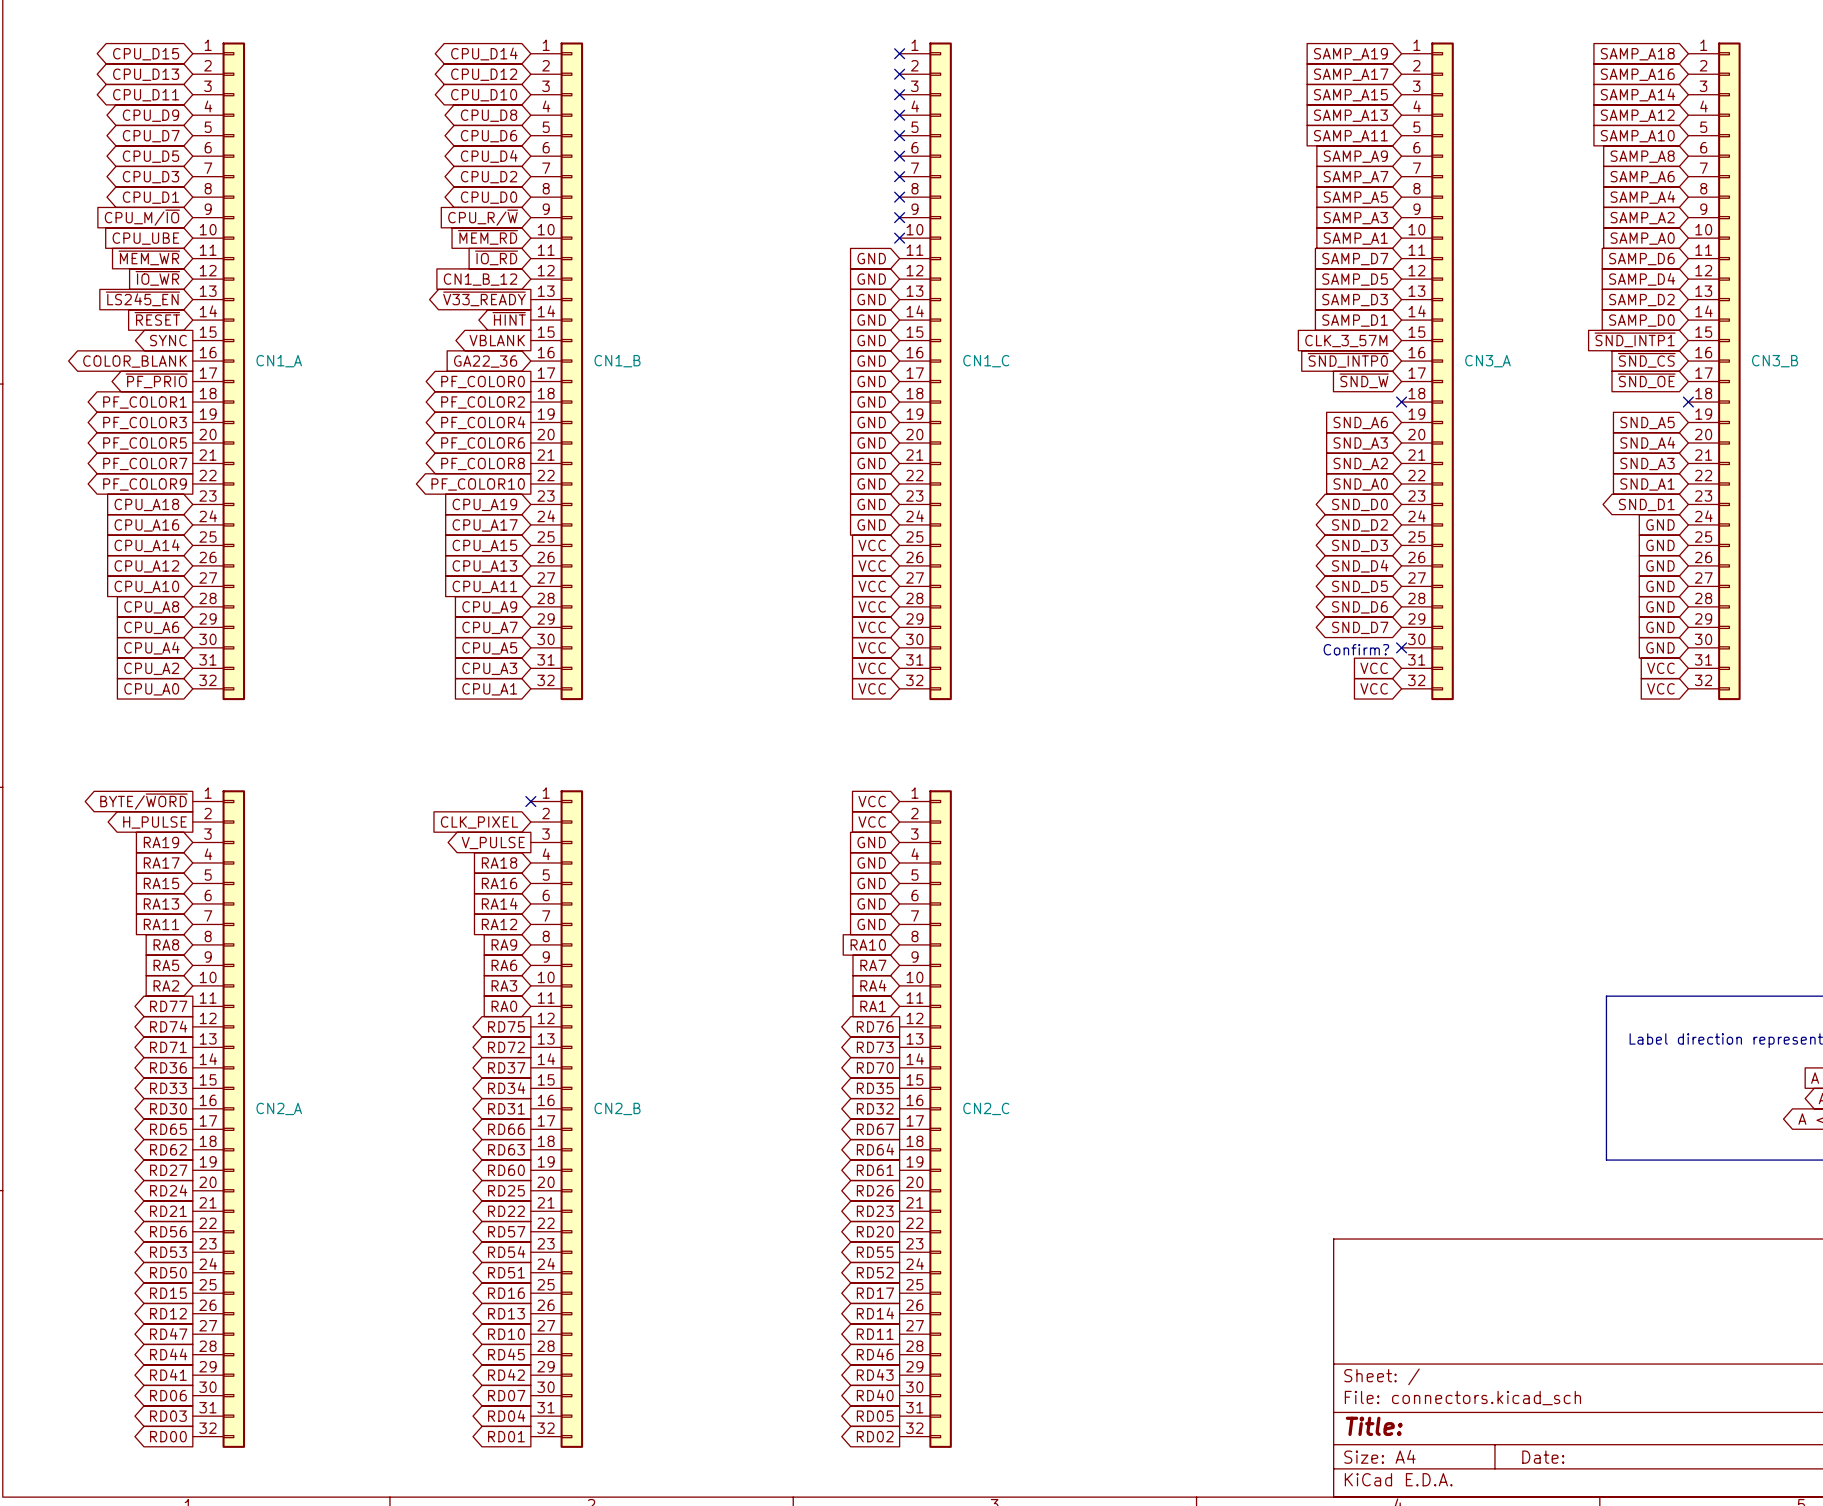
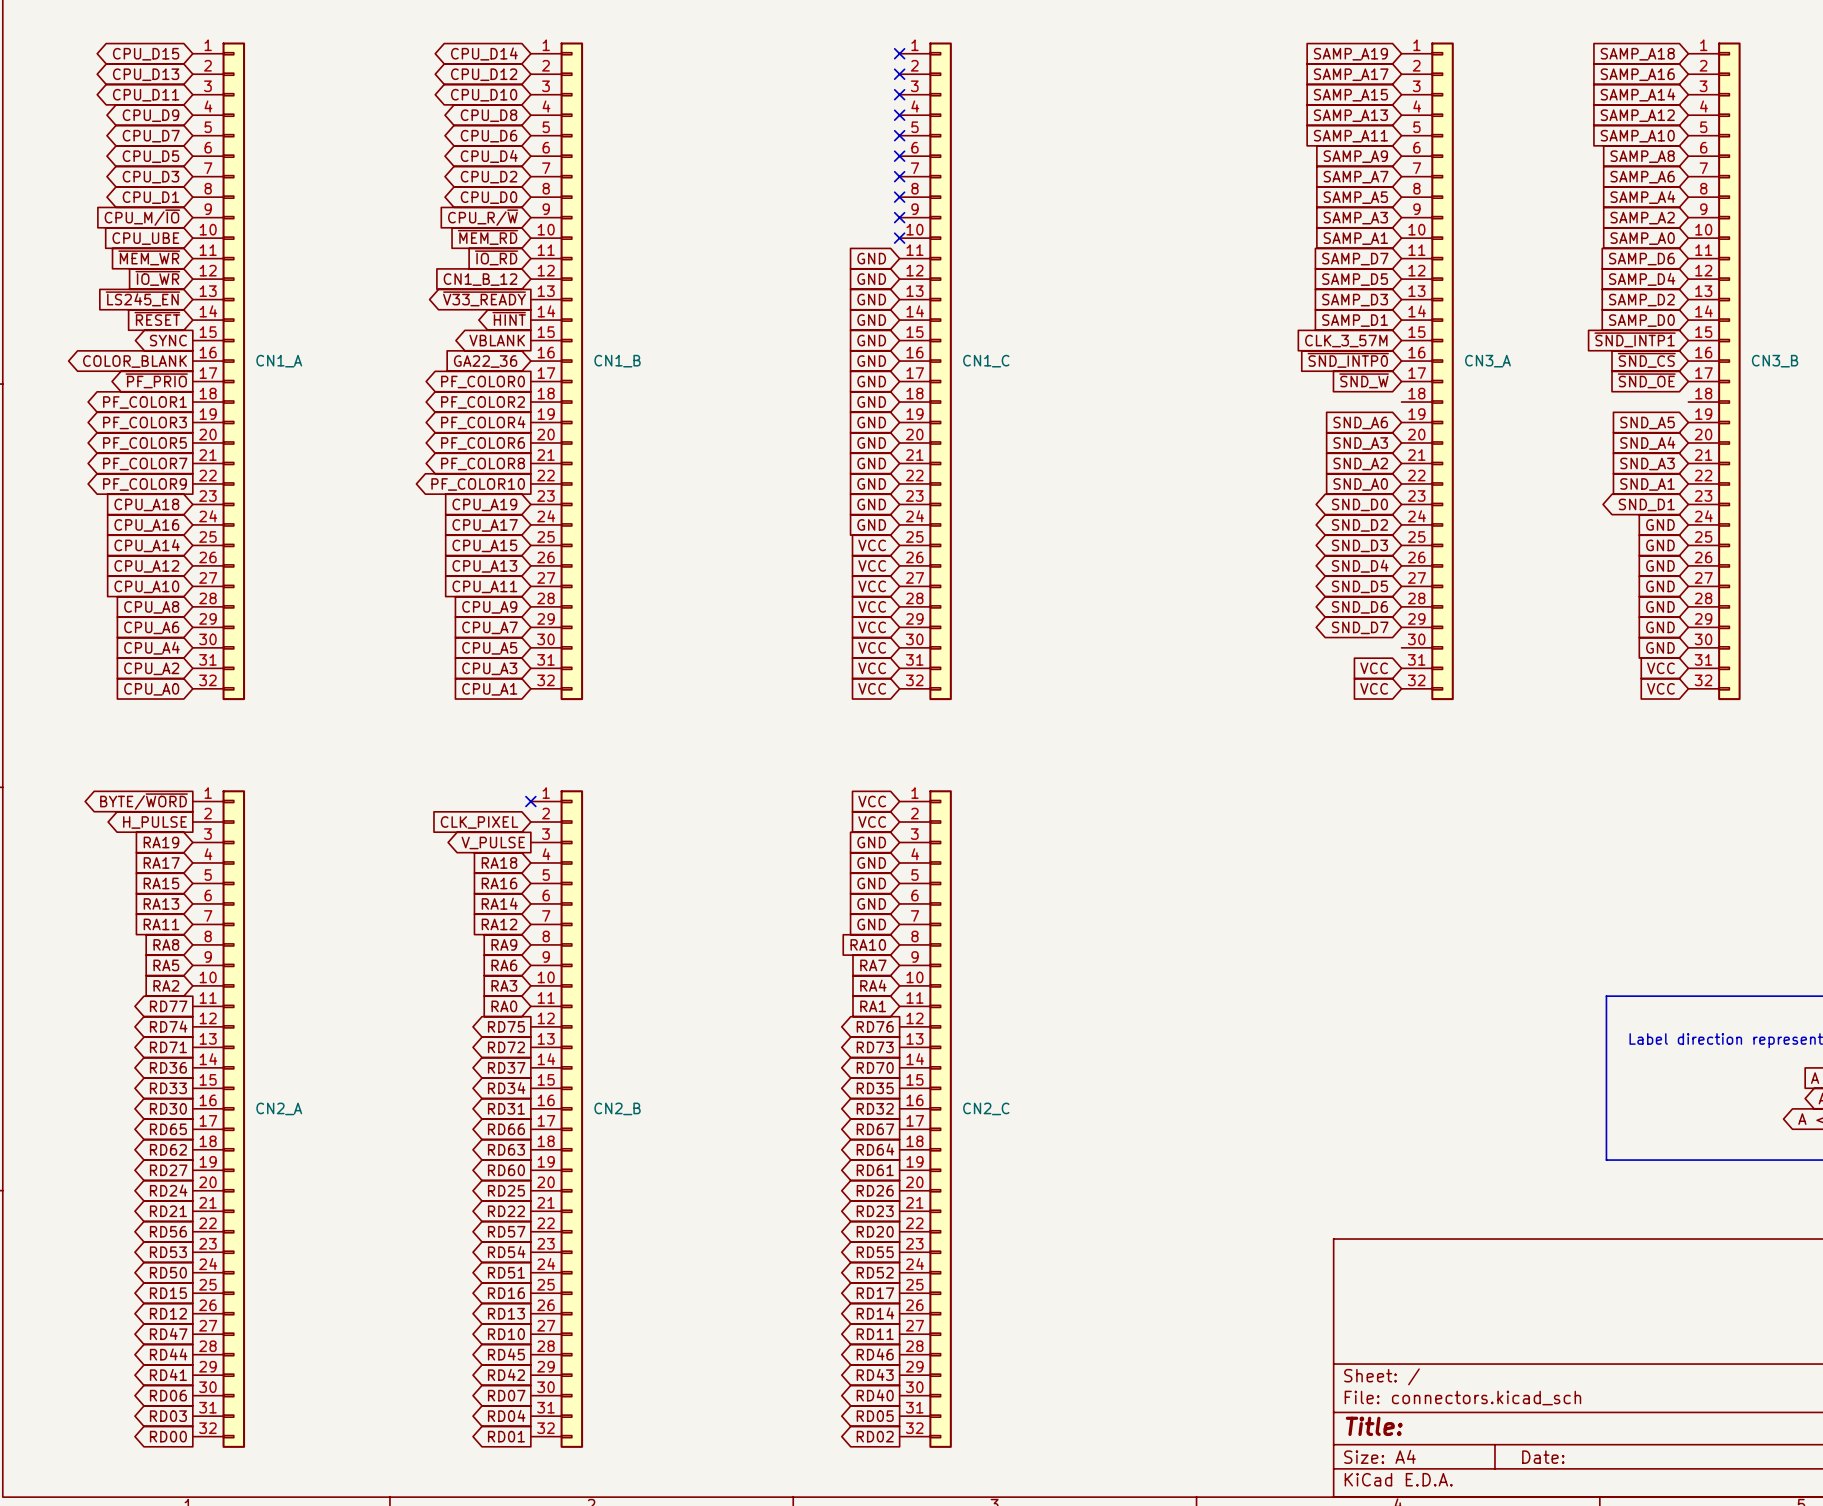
no-connect mark: (1401, 402) -> none
no-connect mark: (1688, 402) -> none
no-connect mark: (1401, 647) -> none
text: Confirm? (1356, 649) -> none

